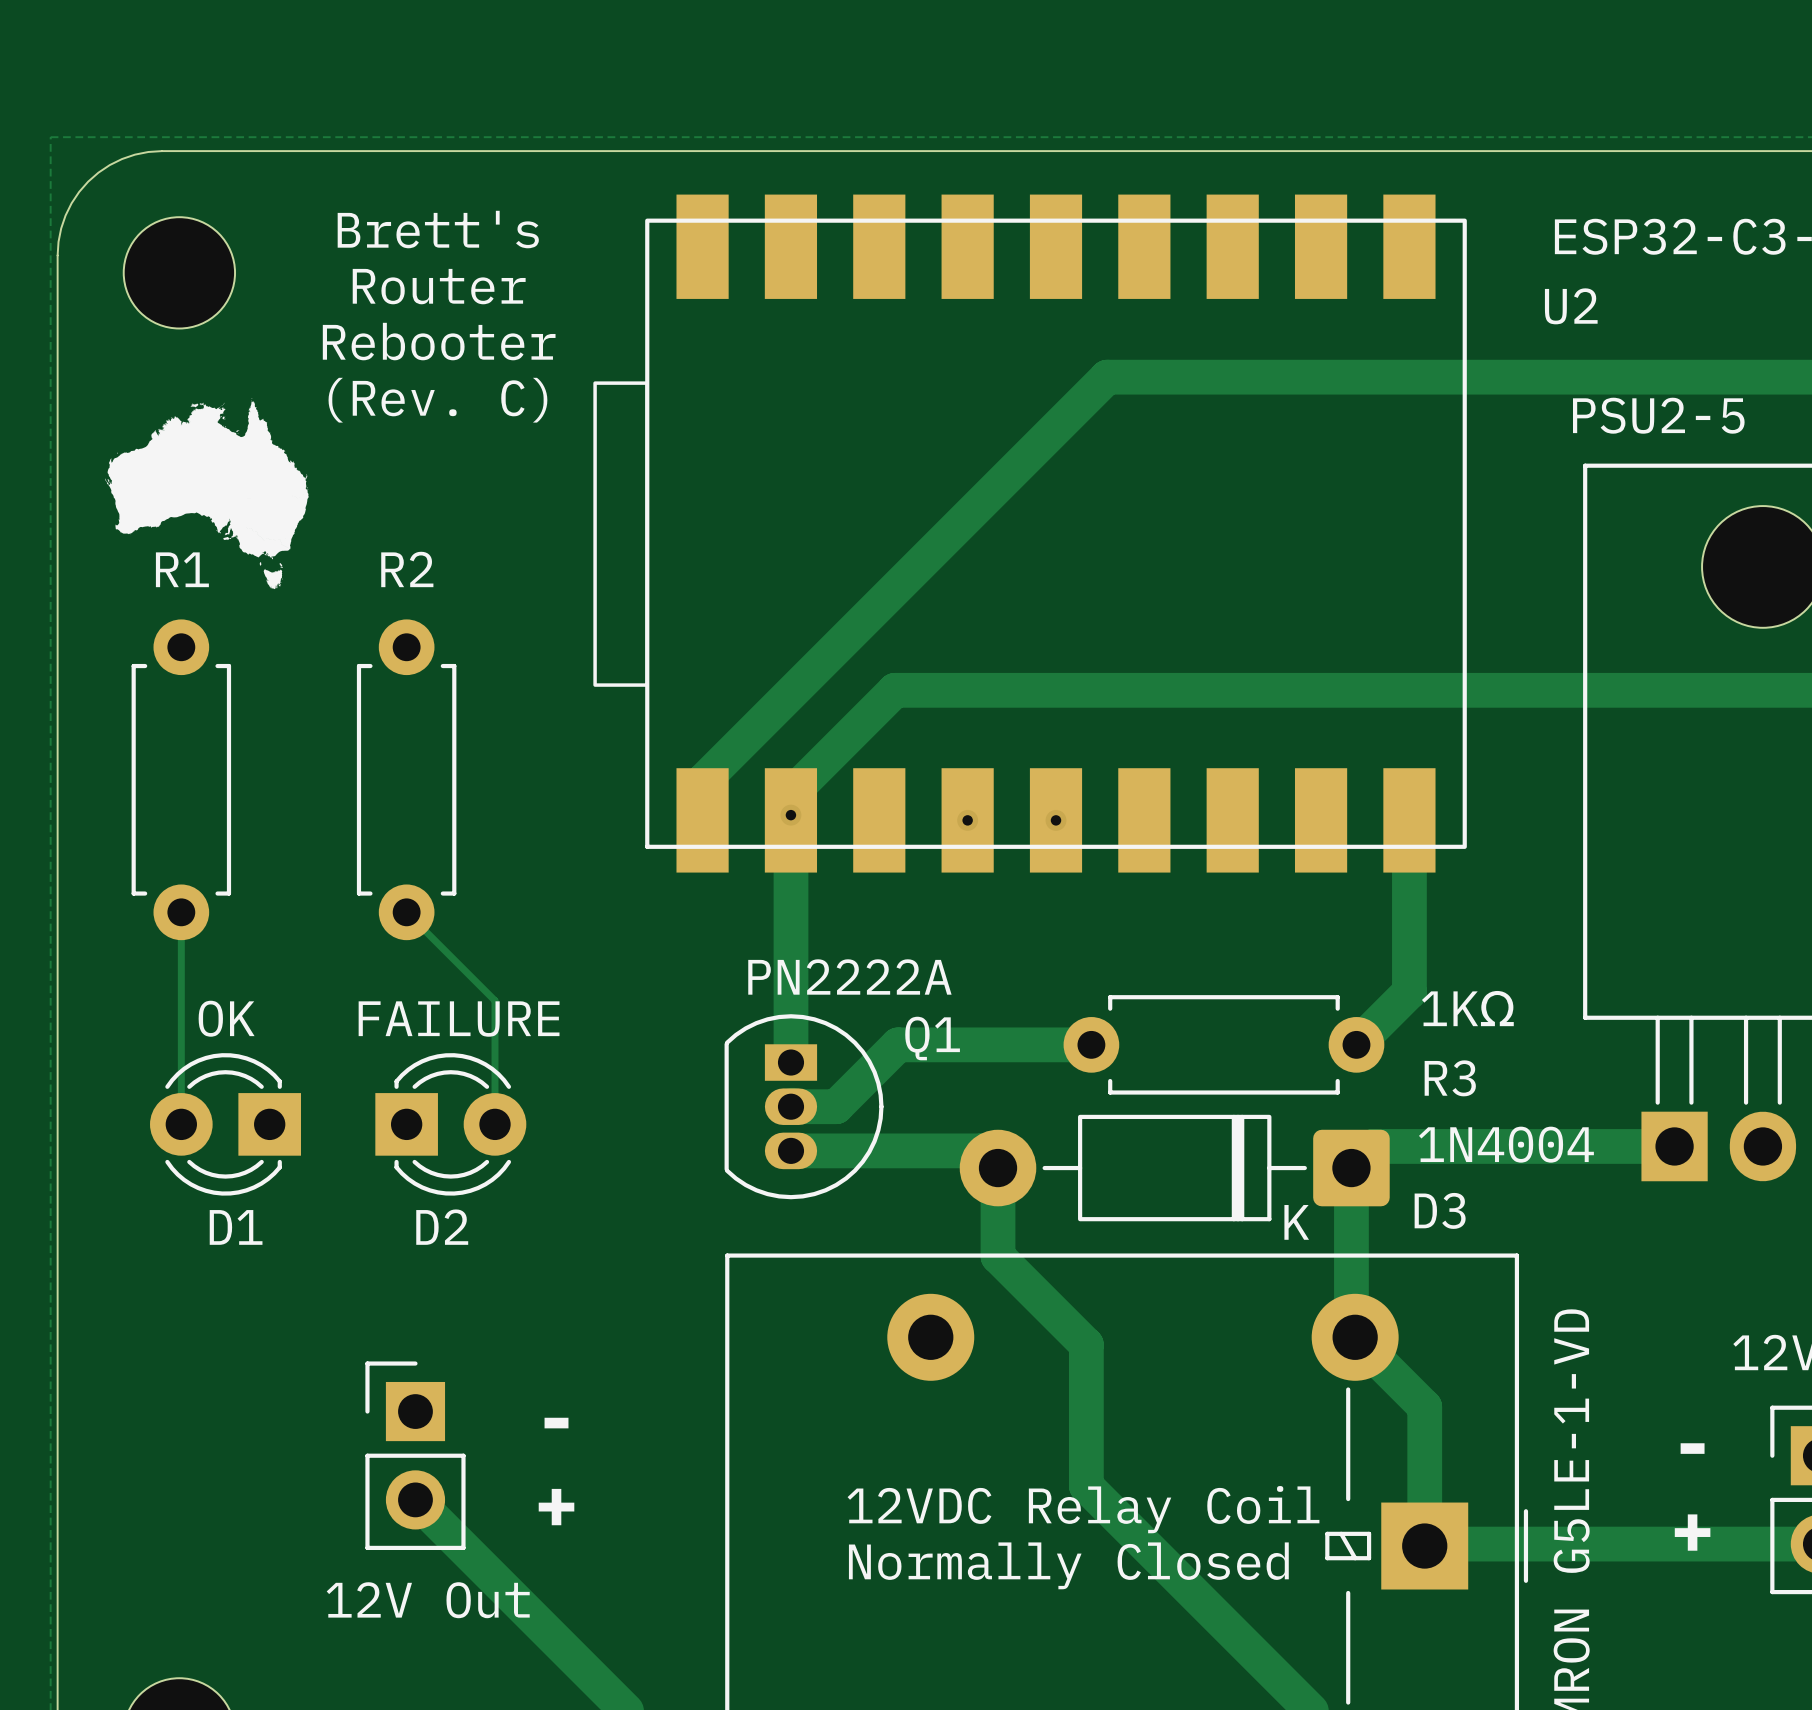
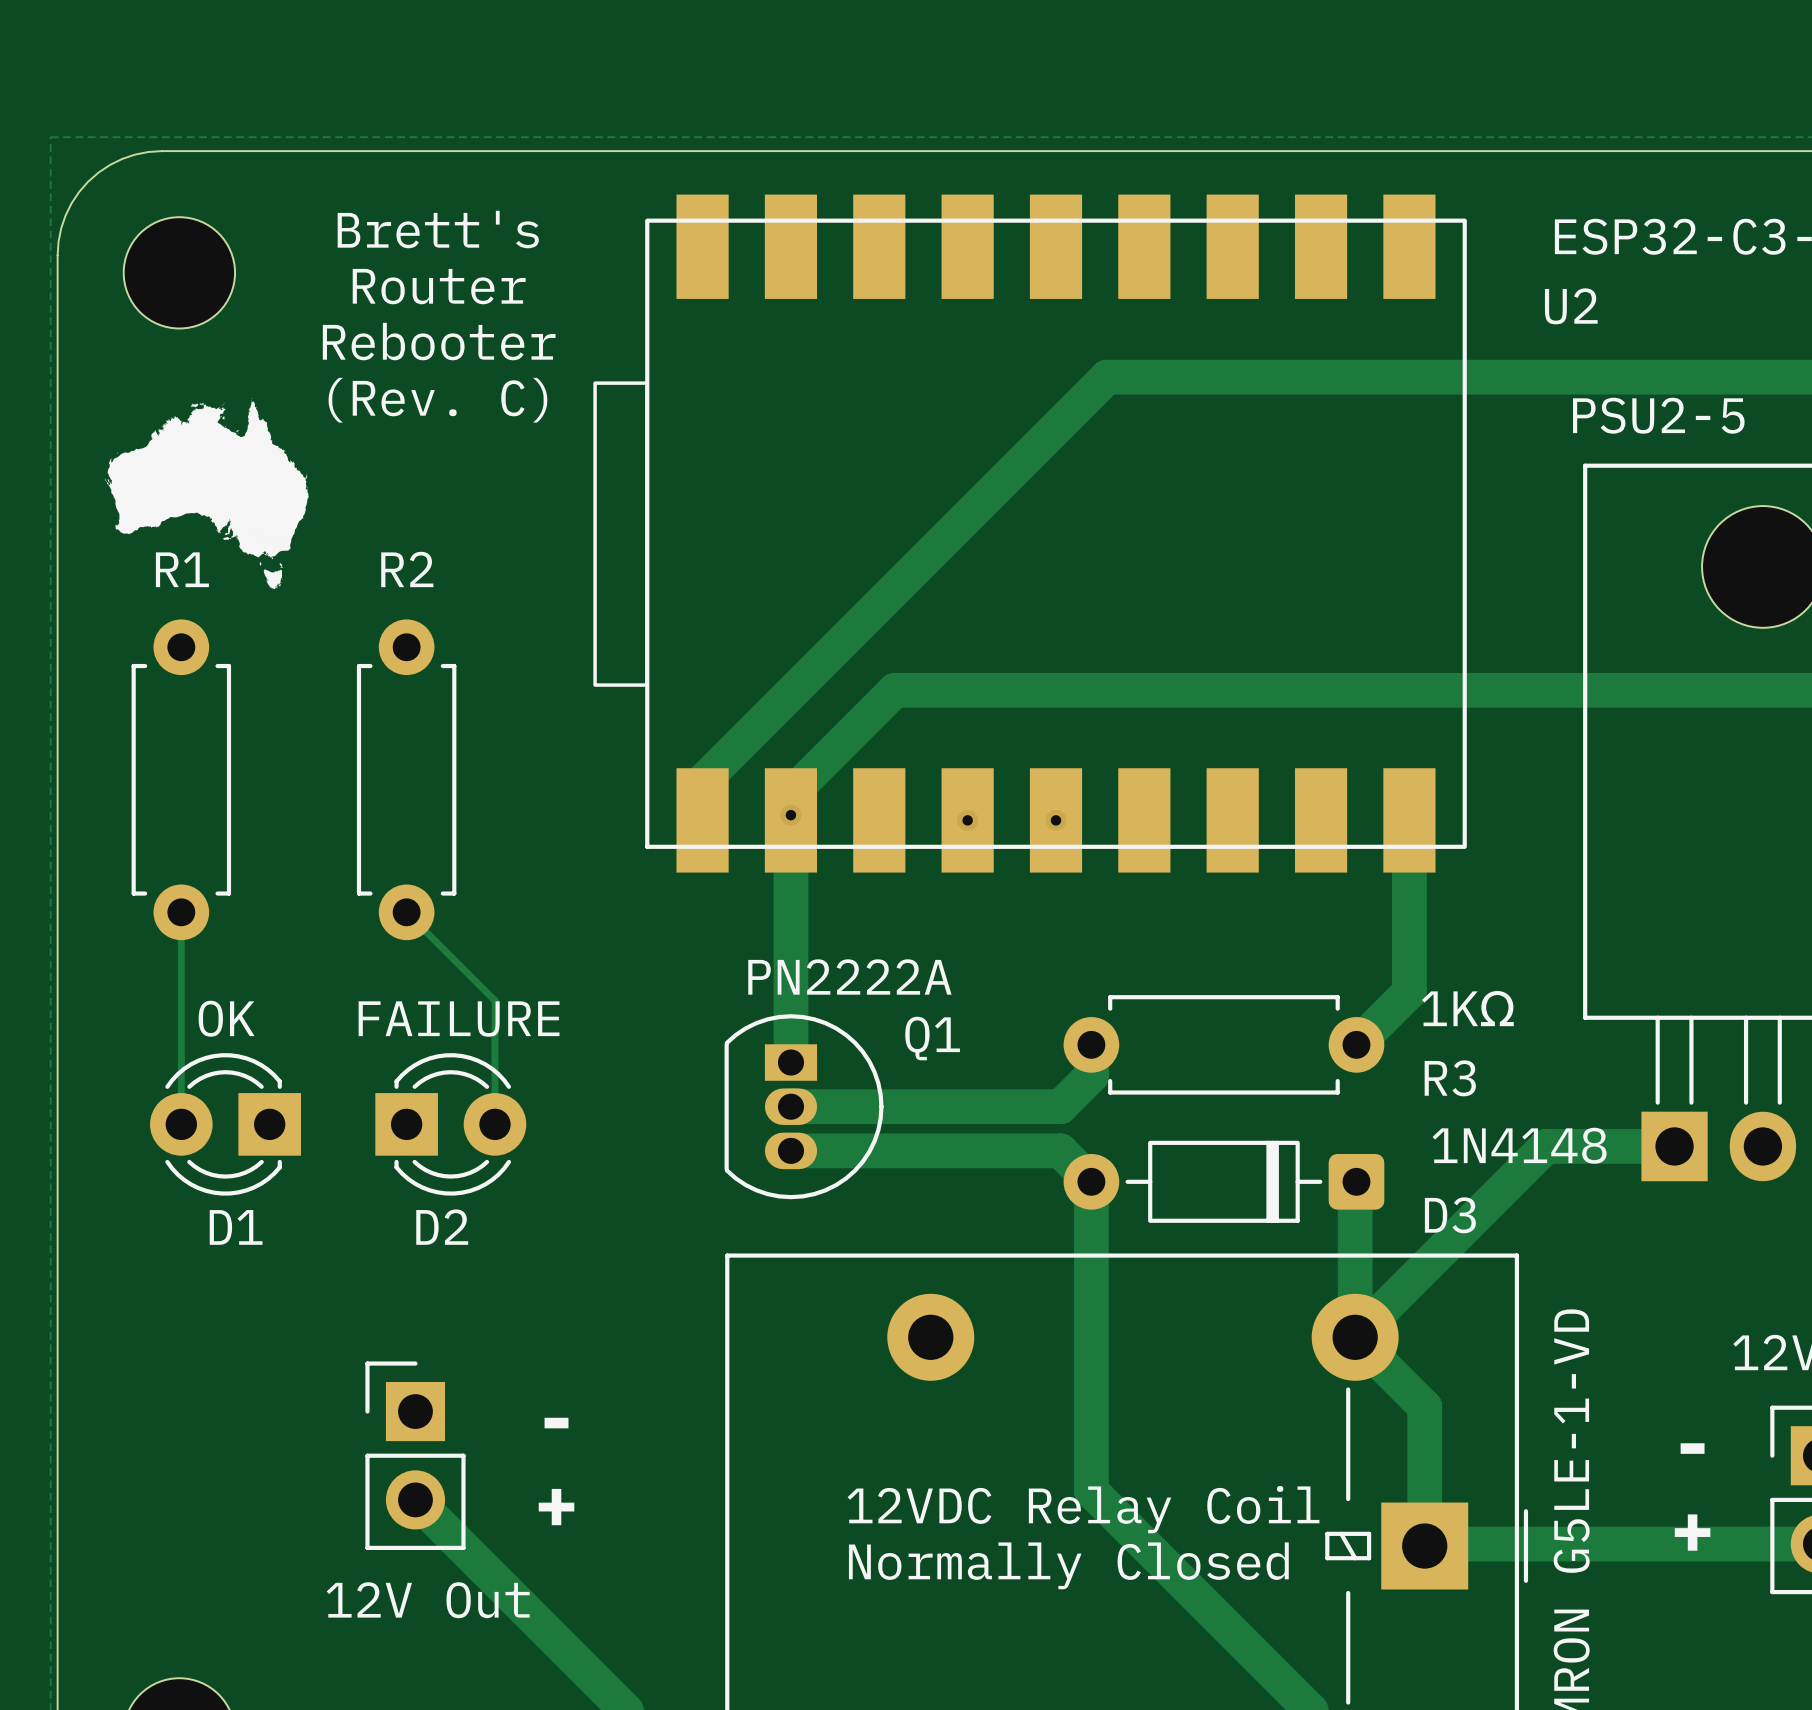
track: (1091, 1044) (898, 1044) (836, 1106) -> (1091, 1044) (1091, 1075) (1060, 1106) (836, 1106)
D3 footprint: [959, 1114, 1390, 1222] -> [1063, 1140, 1385, 1223]
D3 value: 1N4004 (1506, 1144) -> 1N4148 (1519, 1145)
track: (1546, 1146) (1373, 1146) (1351, 1168) (1351, 1333) (1355, 1337) -> (1546, 1146) (1355, 1337) (1356, 1181)
track: (980, 1150) (998, 1168) (998, 1256) (1086, 1344) (1086, 1485) (1091, 1490) -> (980, 1150) (1060, 1150) (1091, 1181) (1091, 1490)

